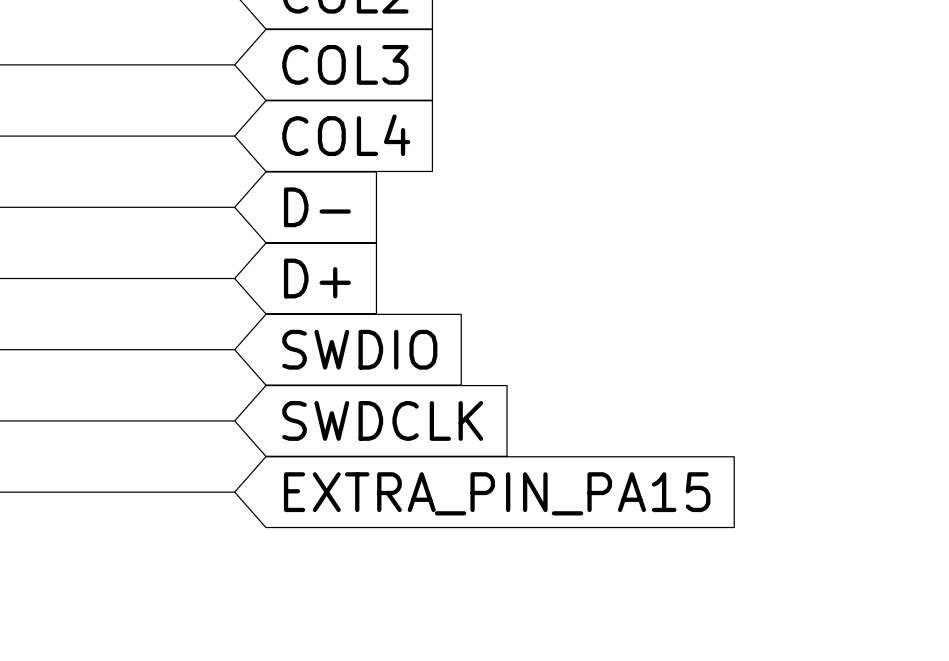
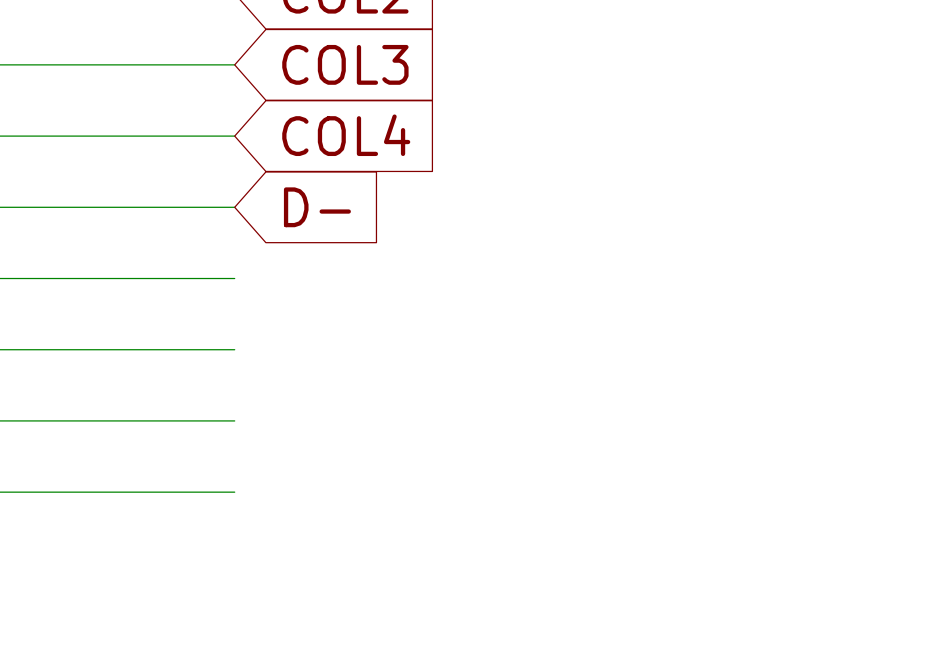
global label: D+ (317, 278) -> none
global label: SWDIO (359, 349) -> none
global label: SWDCLK (382, 420) -> none
global label: EXTRA_PIN_PA15 (497, 493) -> none

